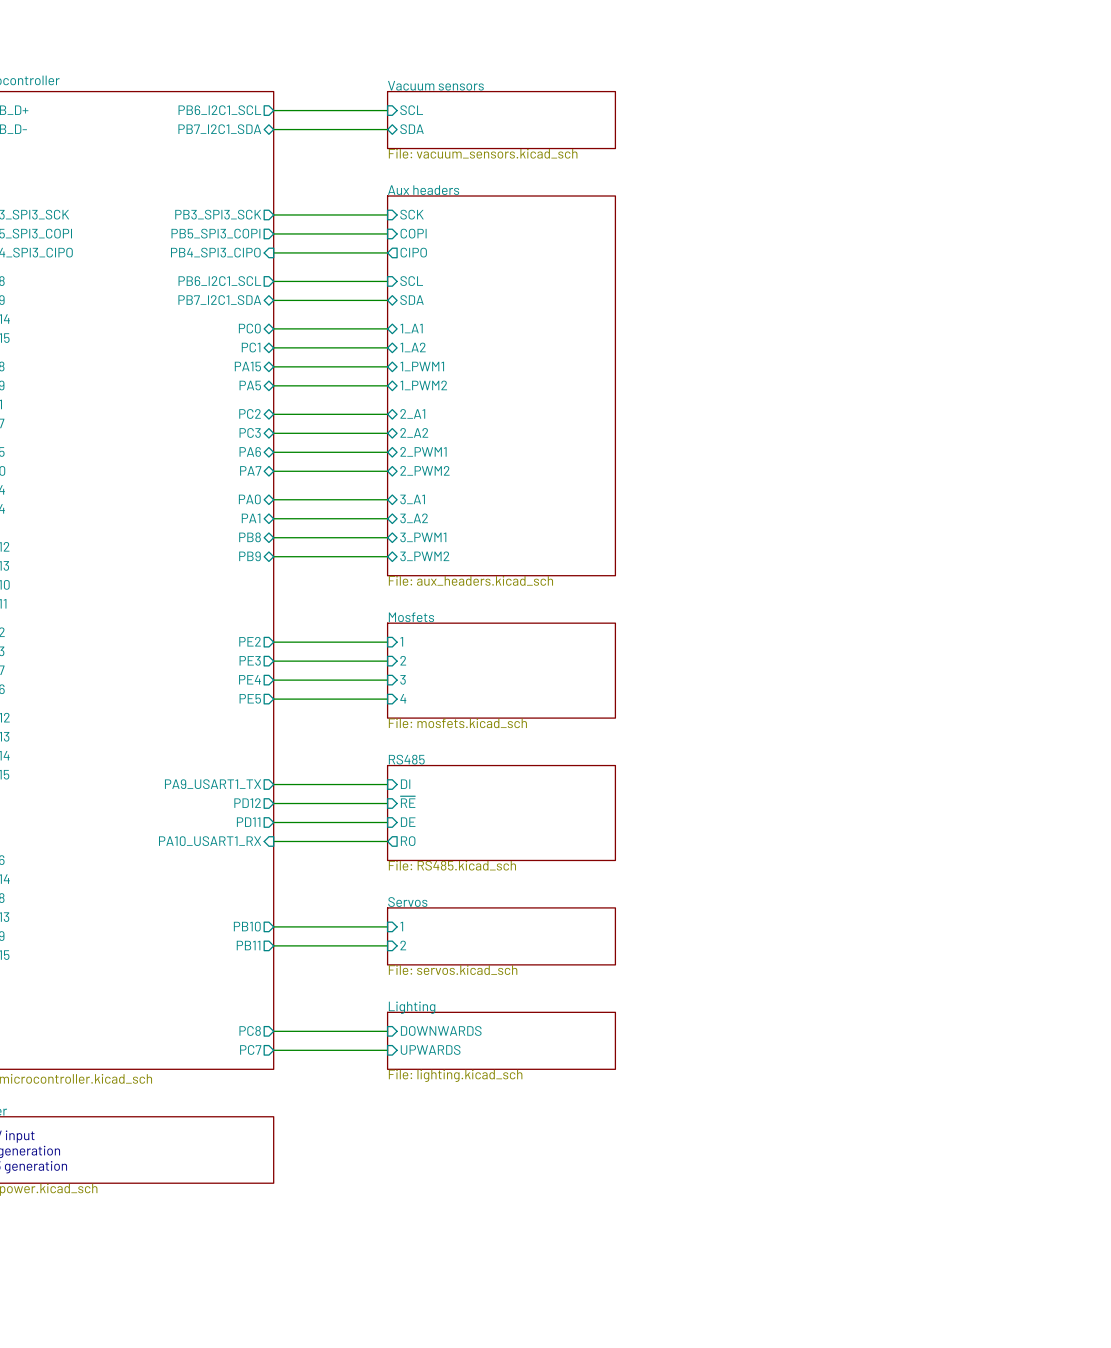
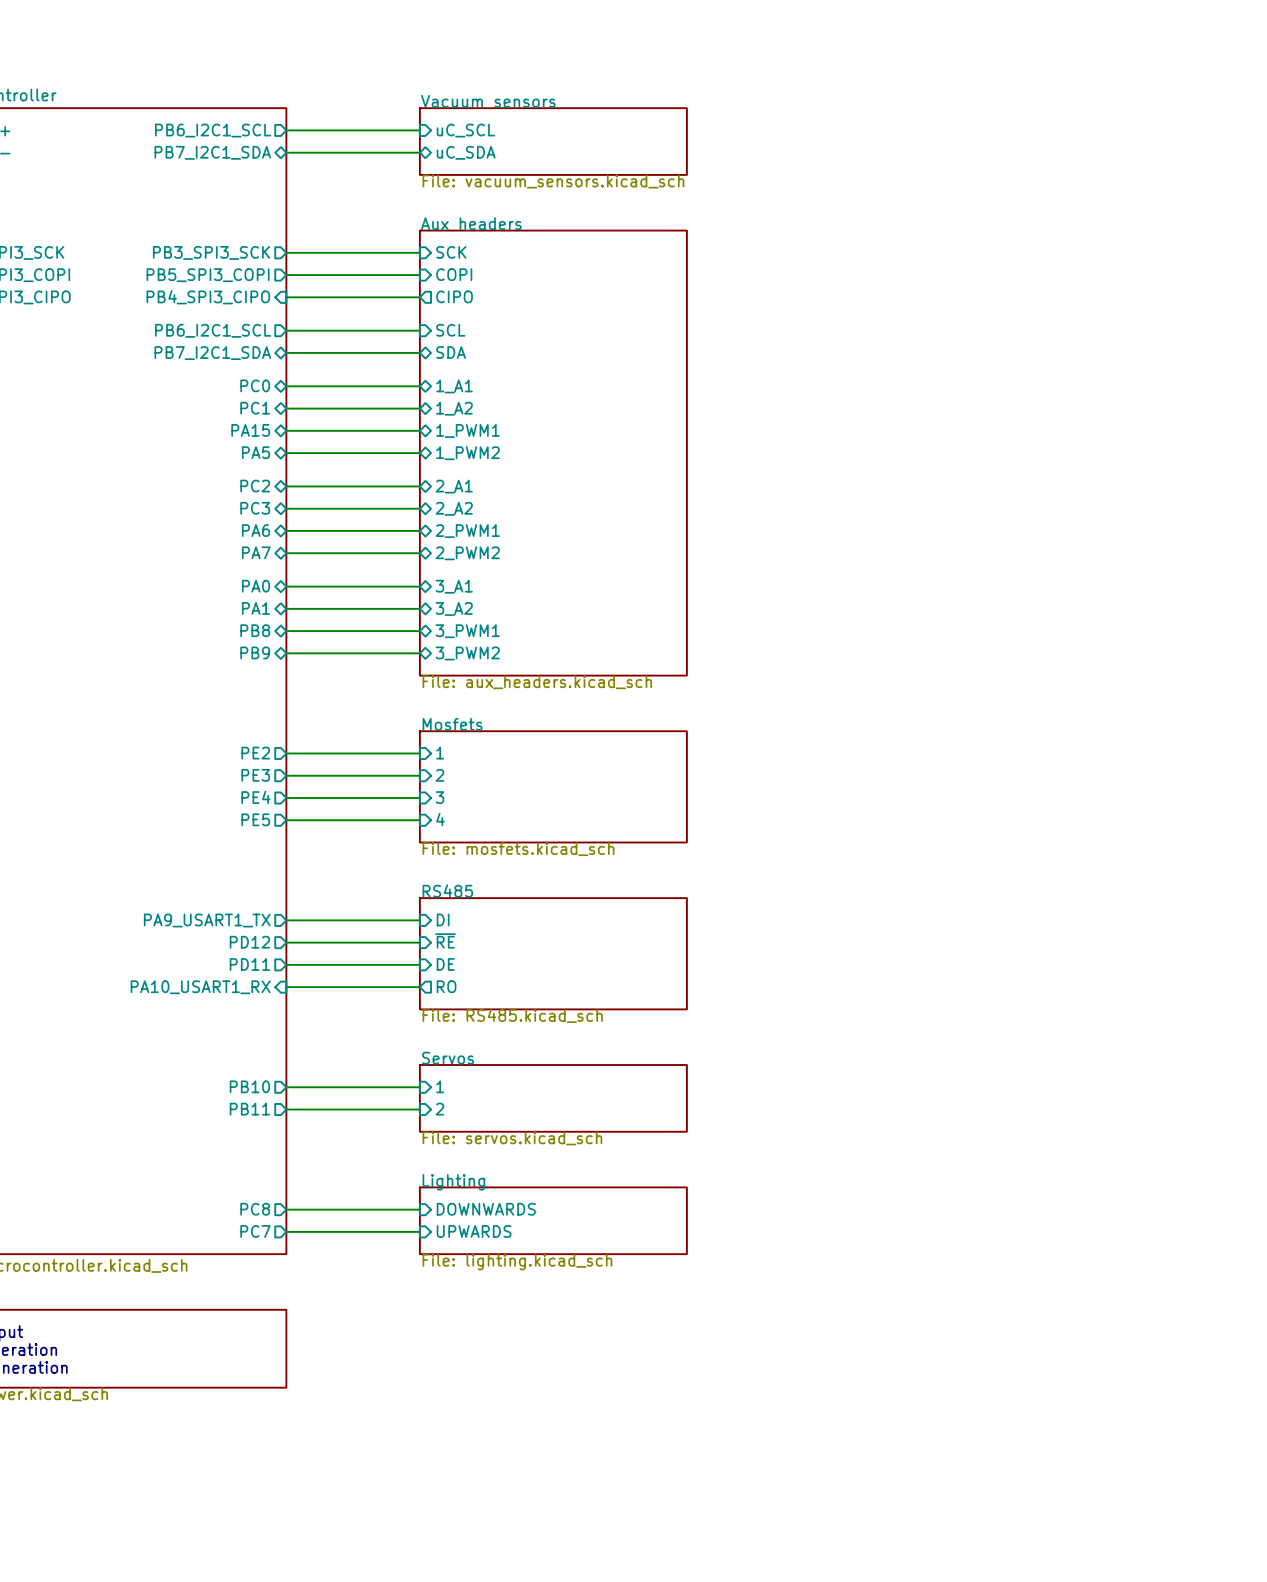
sheet pin: SCL (411, 110) -> uC_SCL (465, 130)
sheet pin: SDA (412, 129) -> uC_SDA (466, 152)

